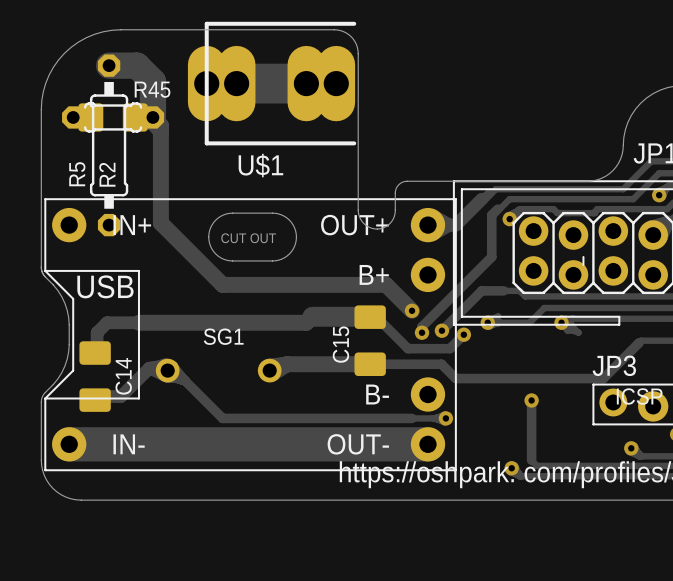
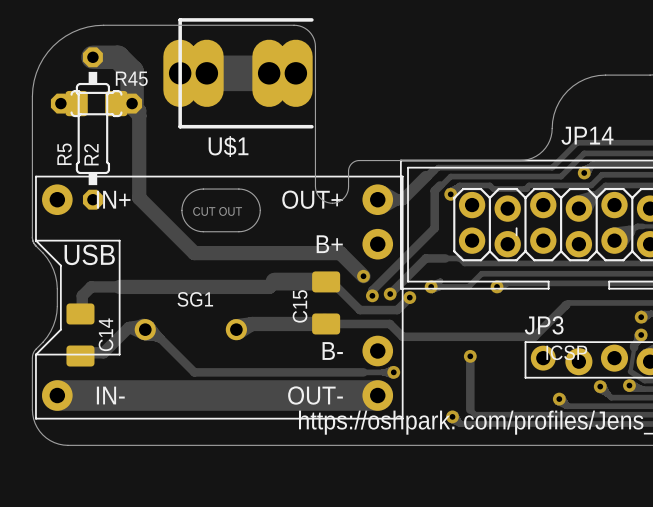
track: (561, 322) (571, 324) (578, 332) (567, 330) (561, 322) -> none

